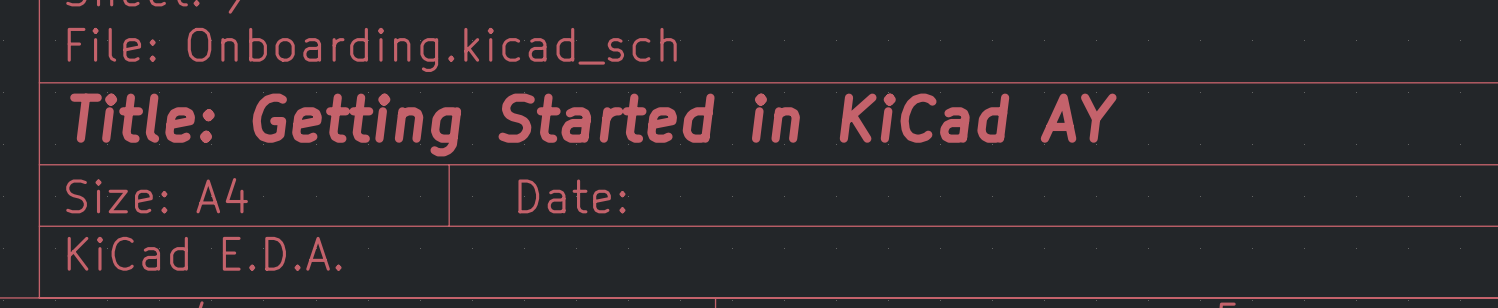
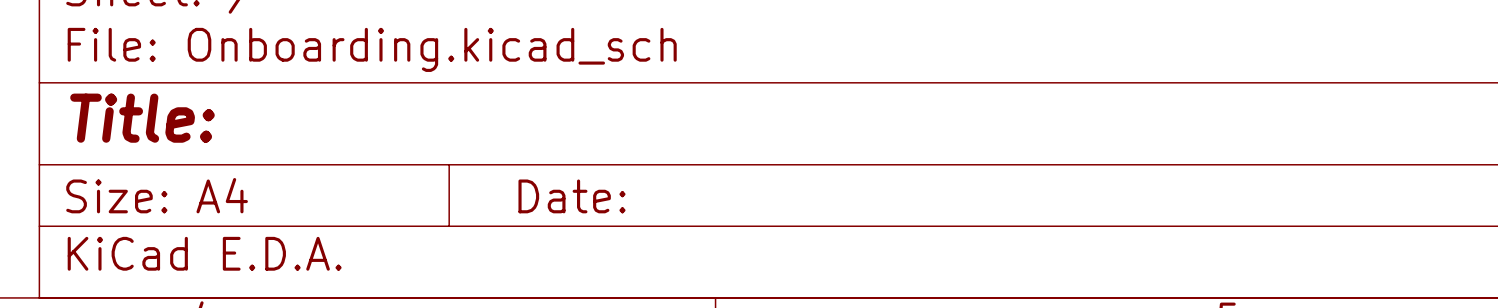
title block: Title: Getting Started in KiCad AY (593, 124) -> Title: (142, 118)

